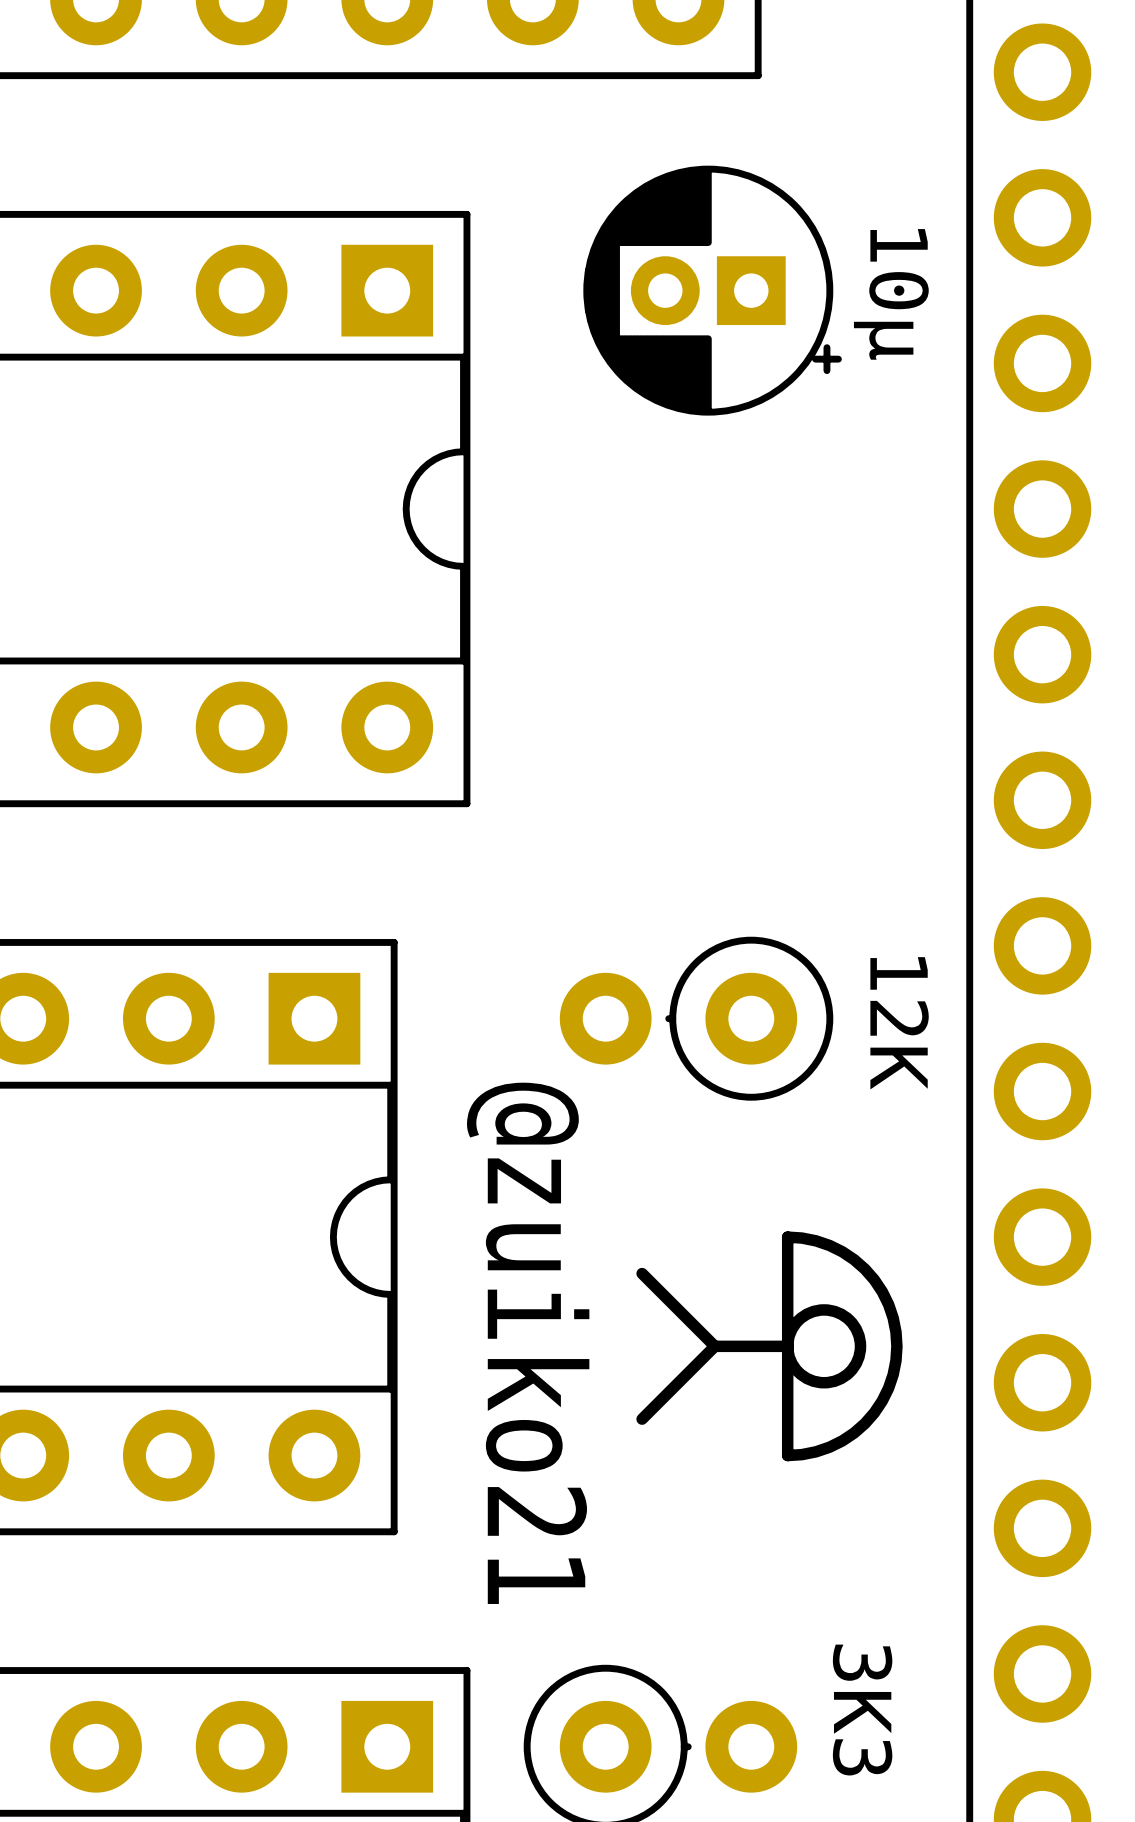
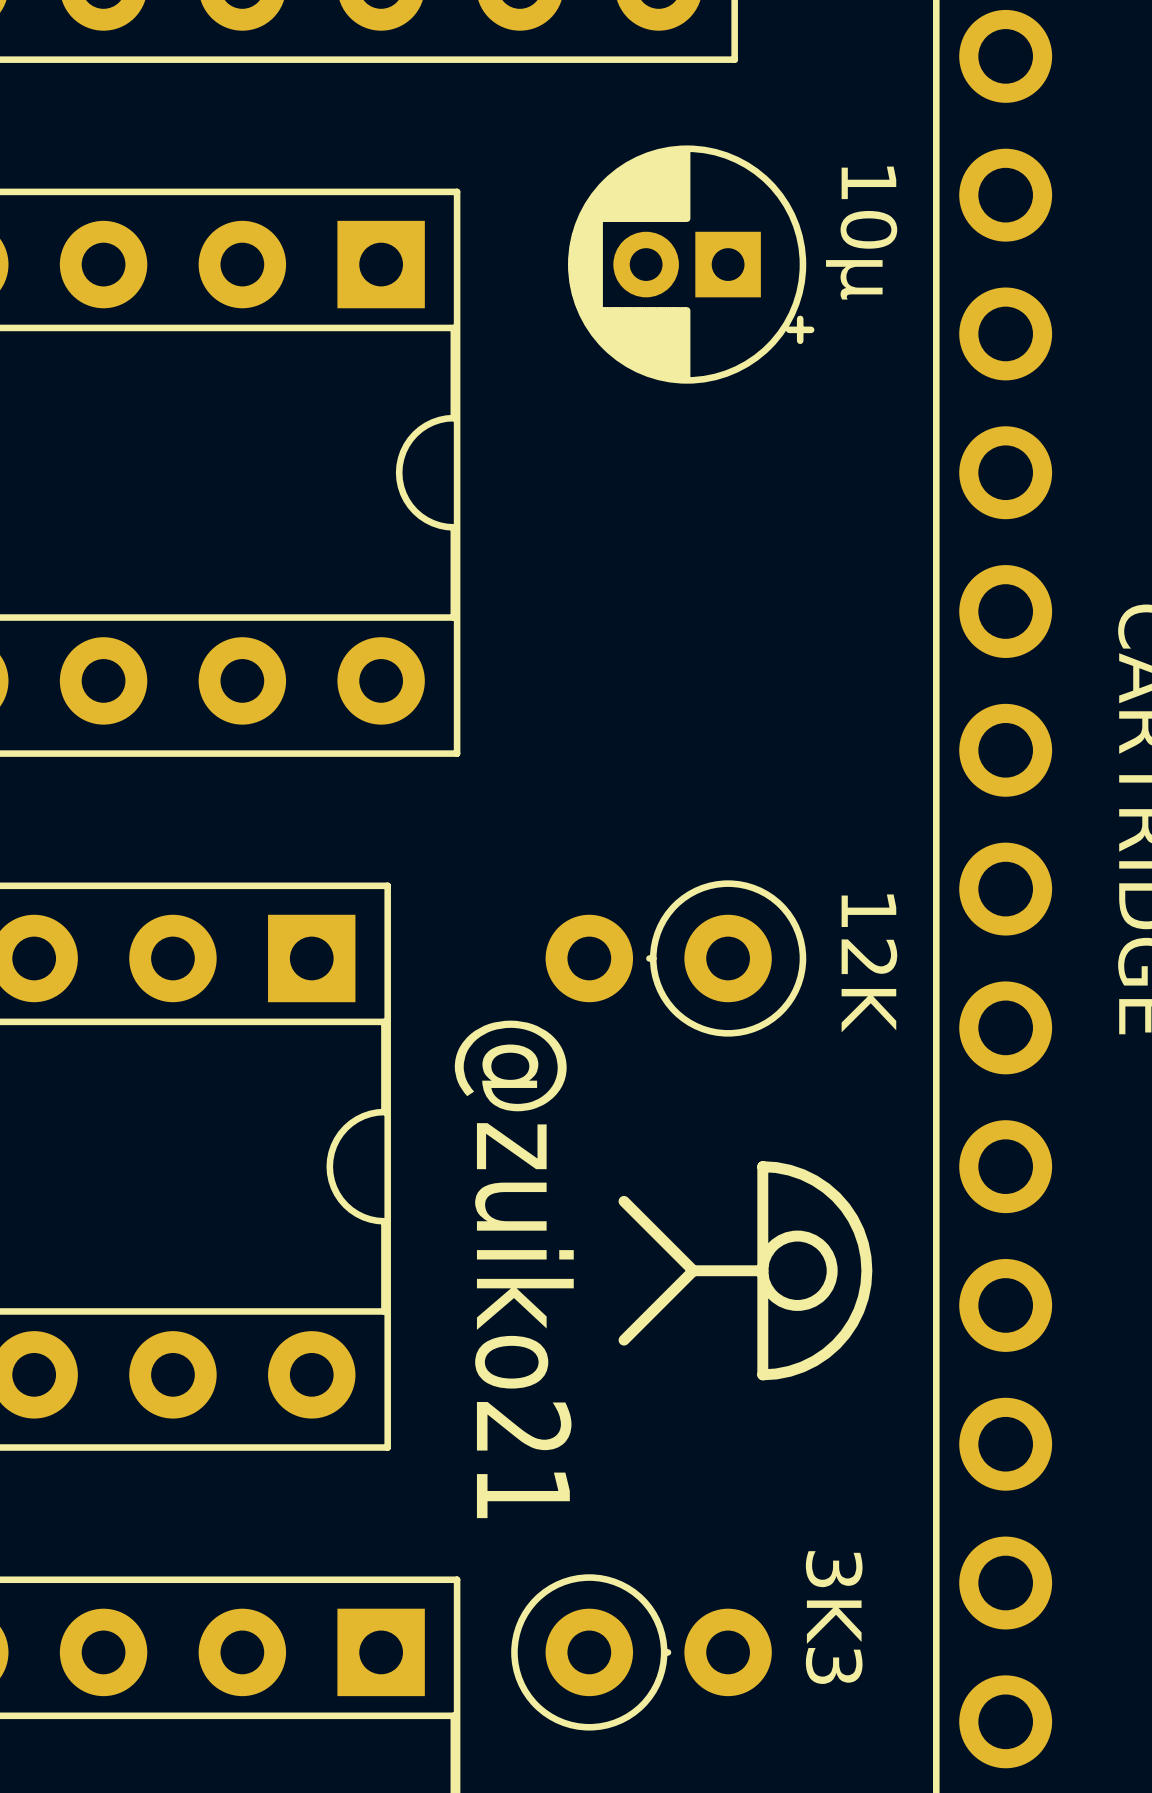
part value position: 10µ (891, 294) -> 10µ (861, 233)

